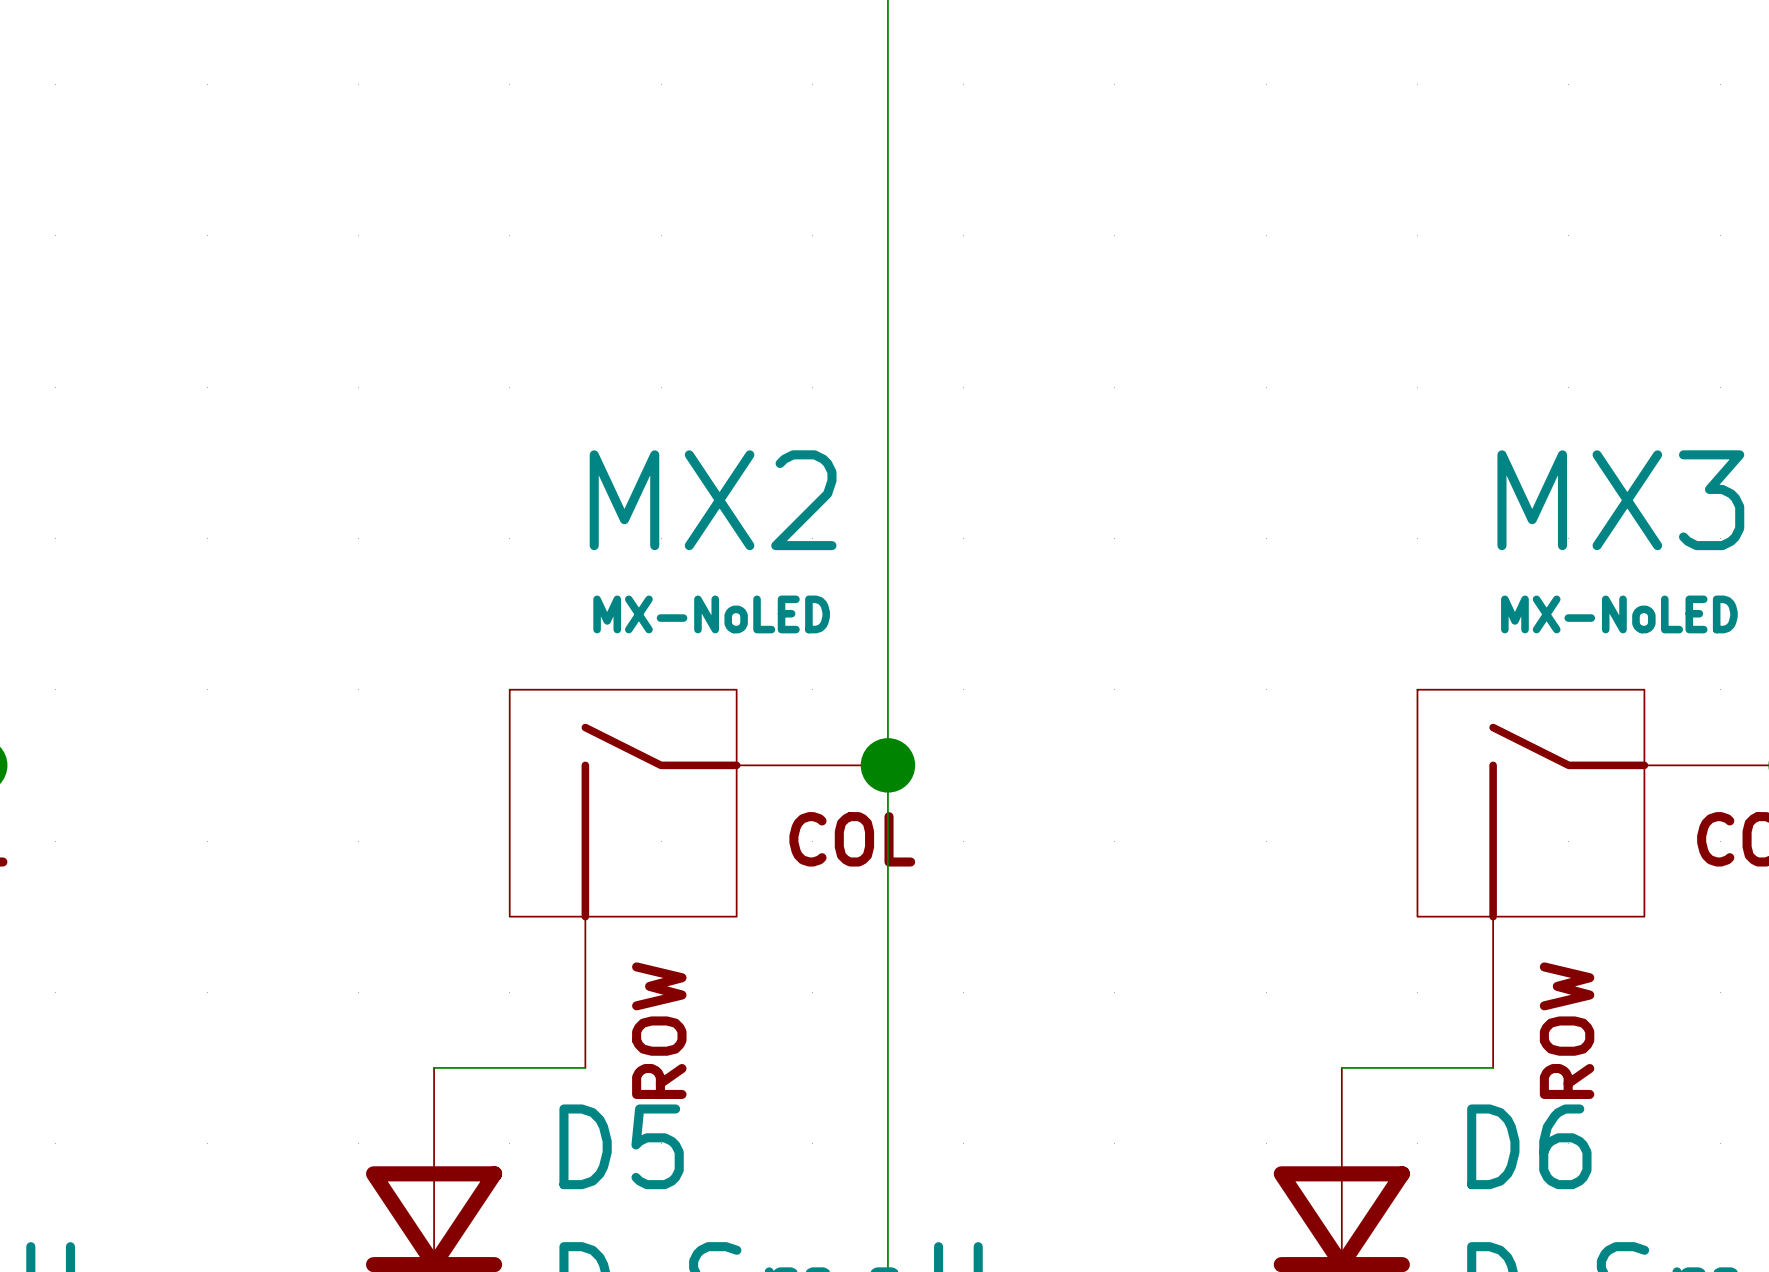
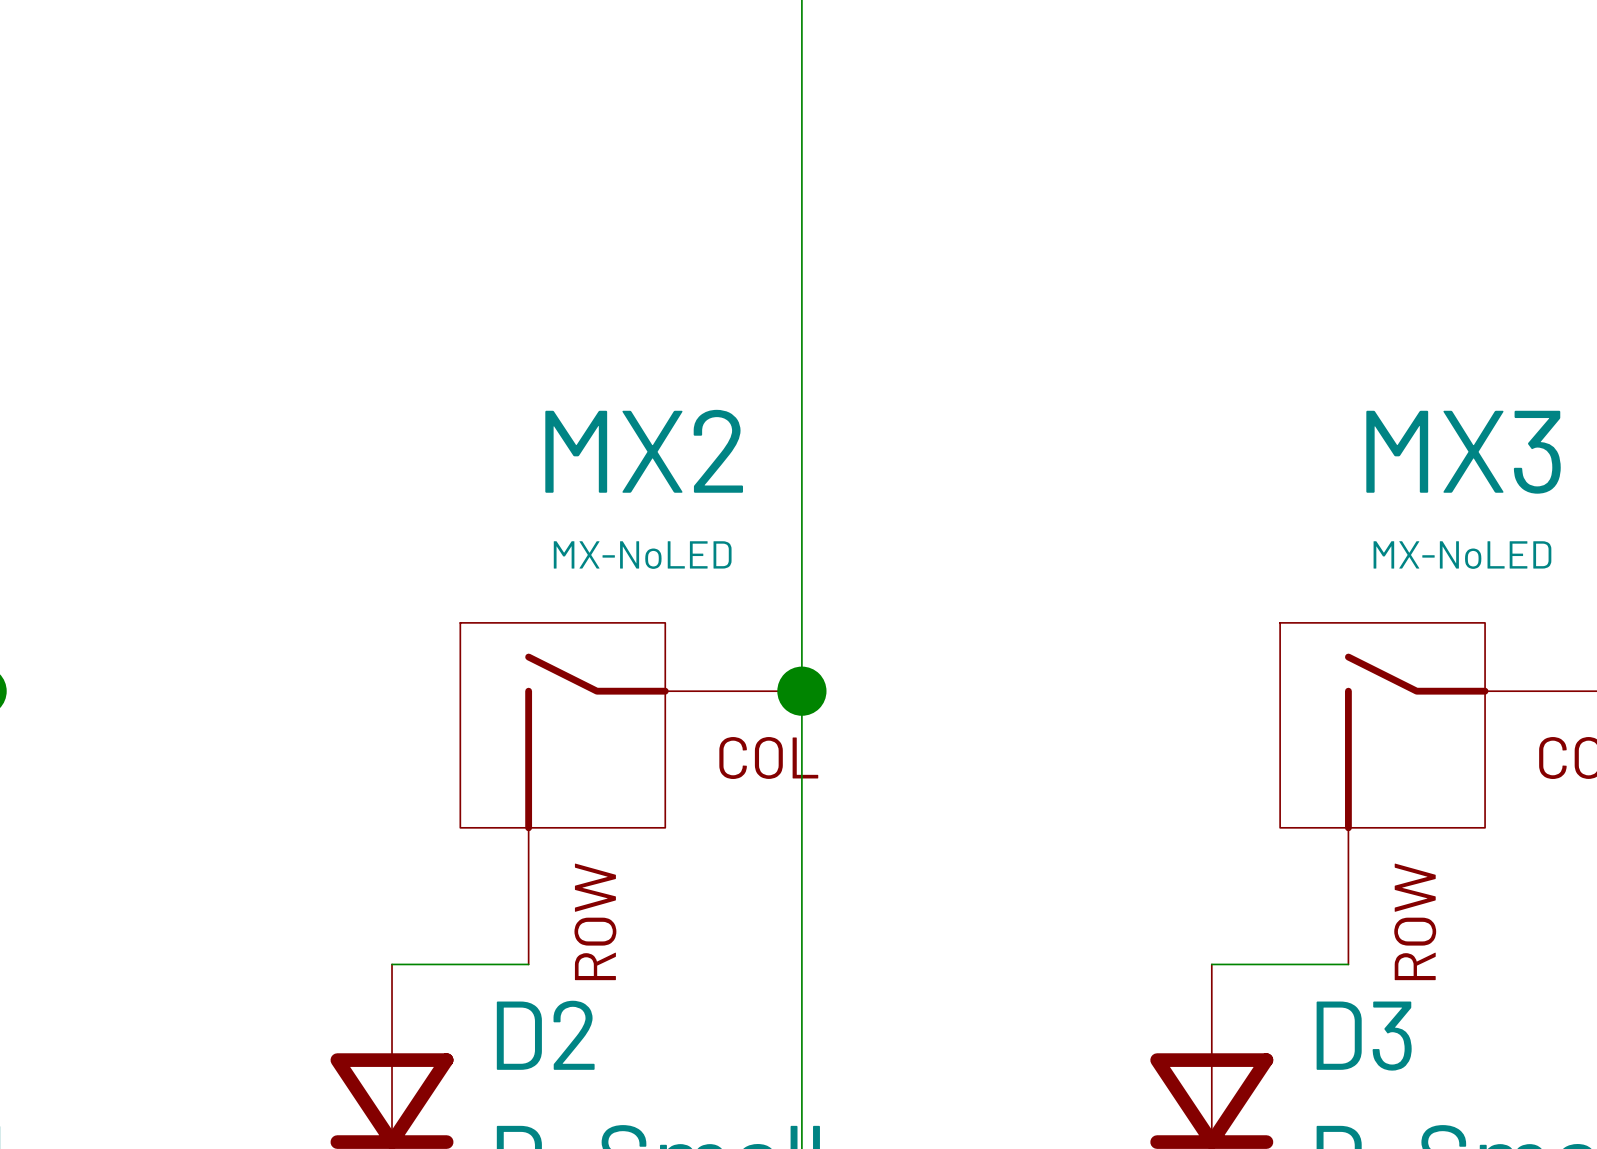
D5 name: D5 (621, 1146) -> D2 (545, 1035)
D6 name: D6 (1529, 1146) -> D3 (1364, 1036)

